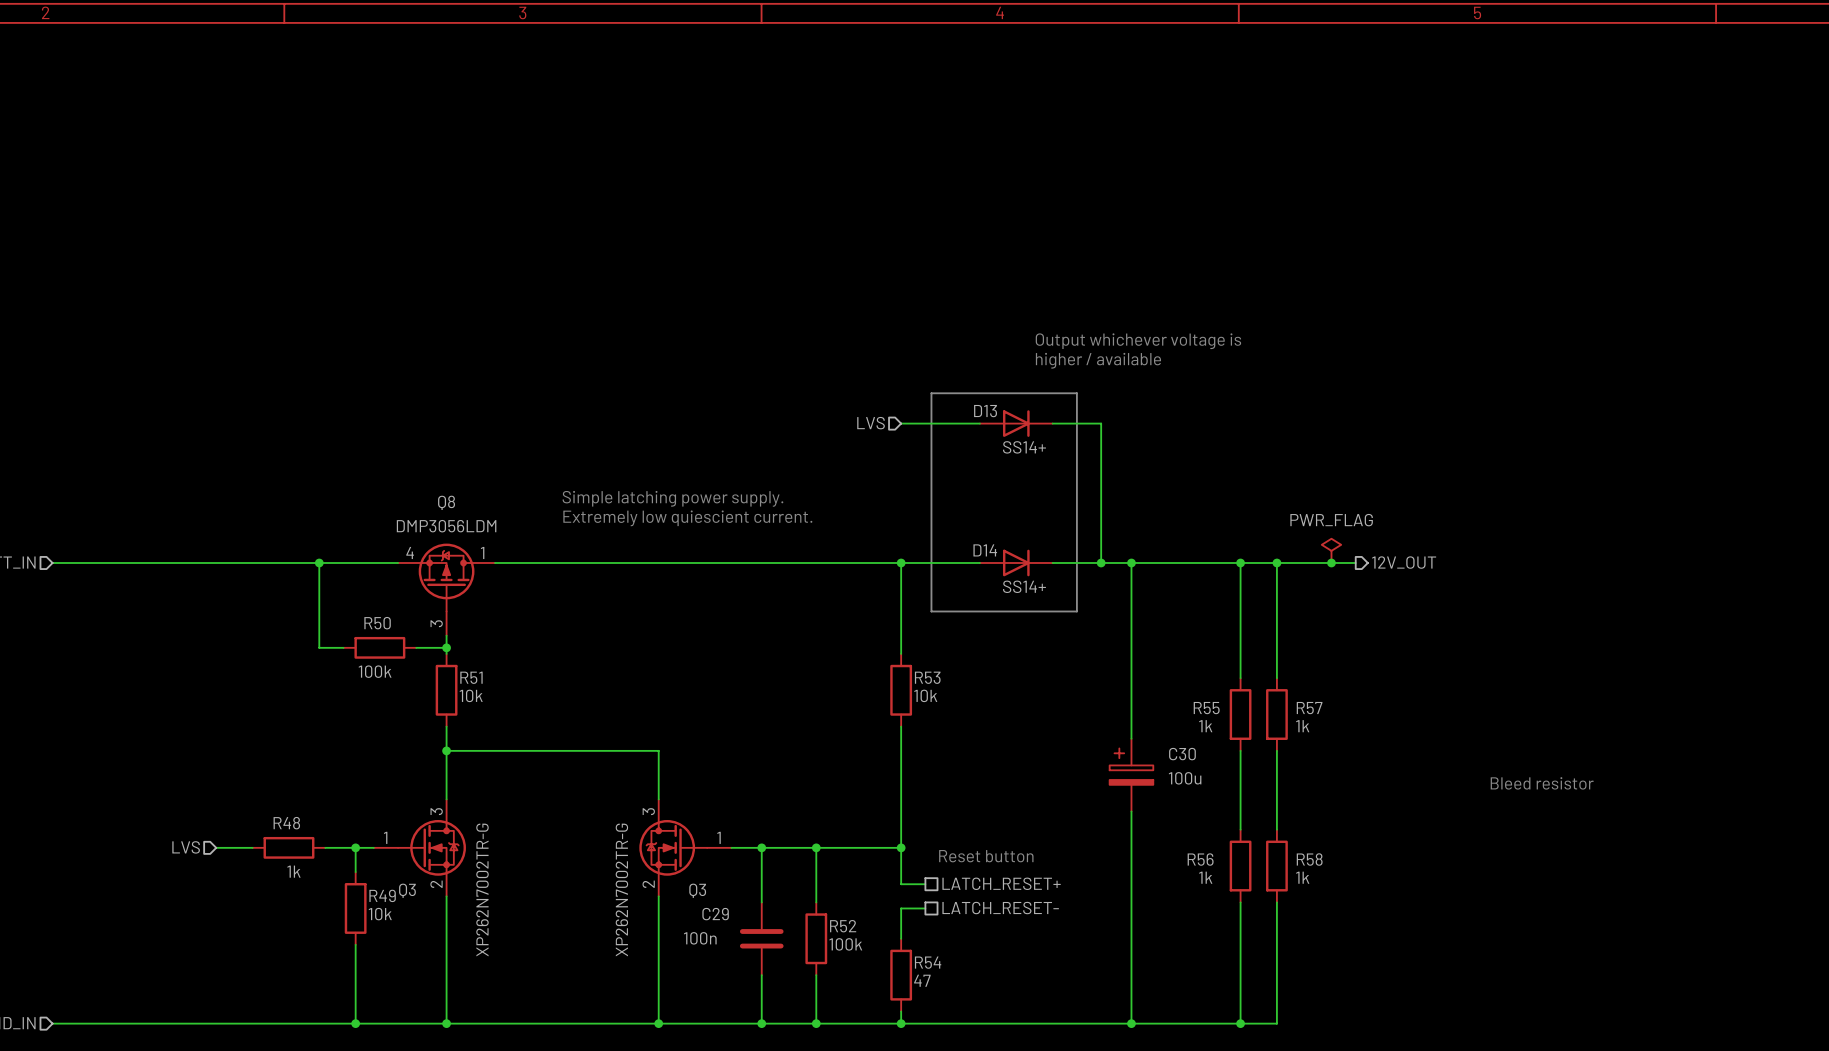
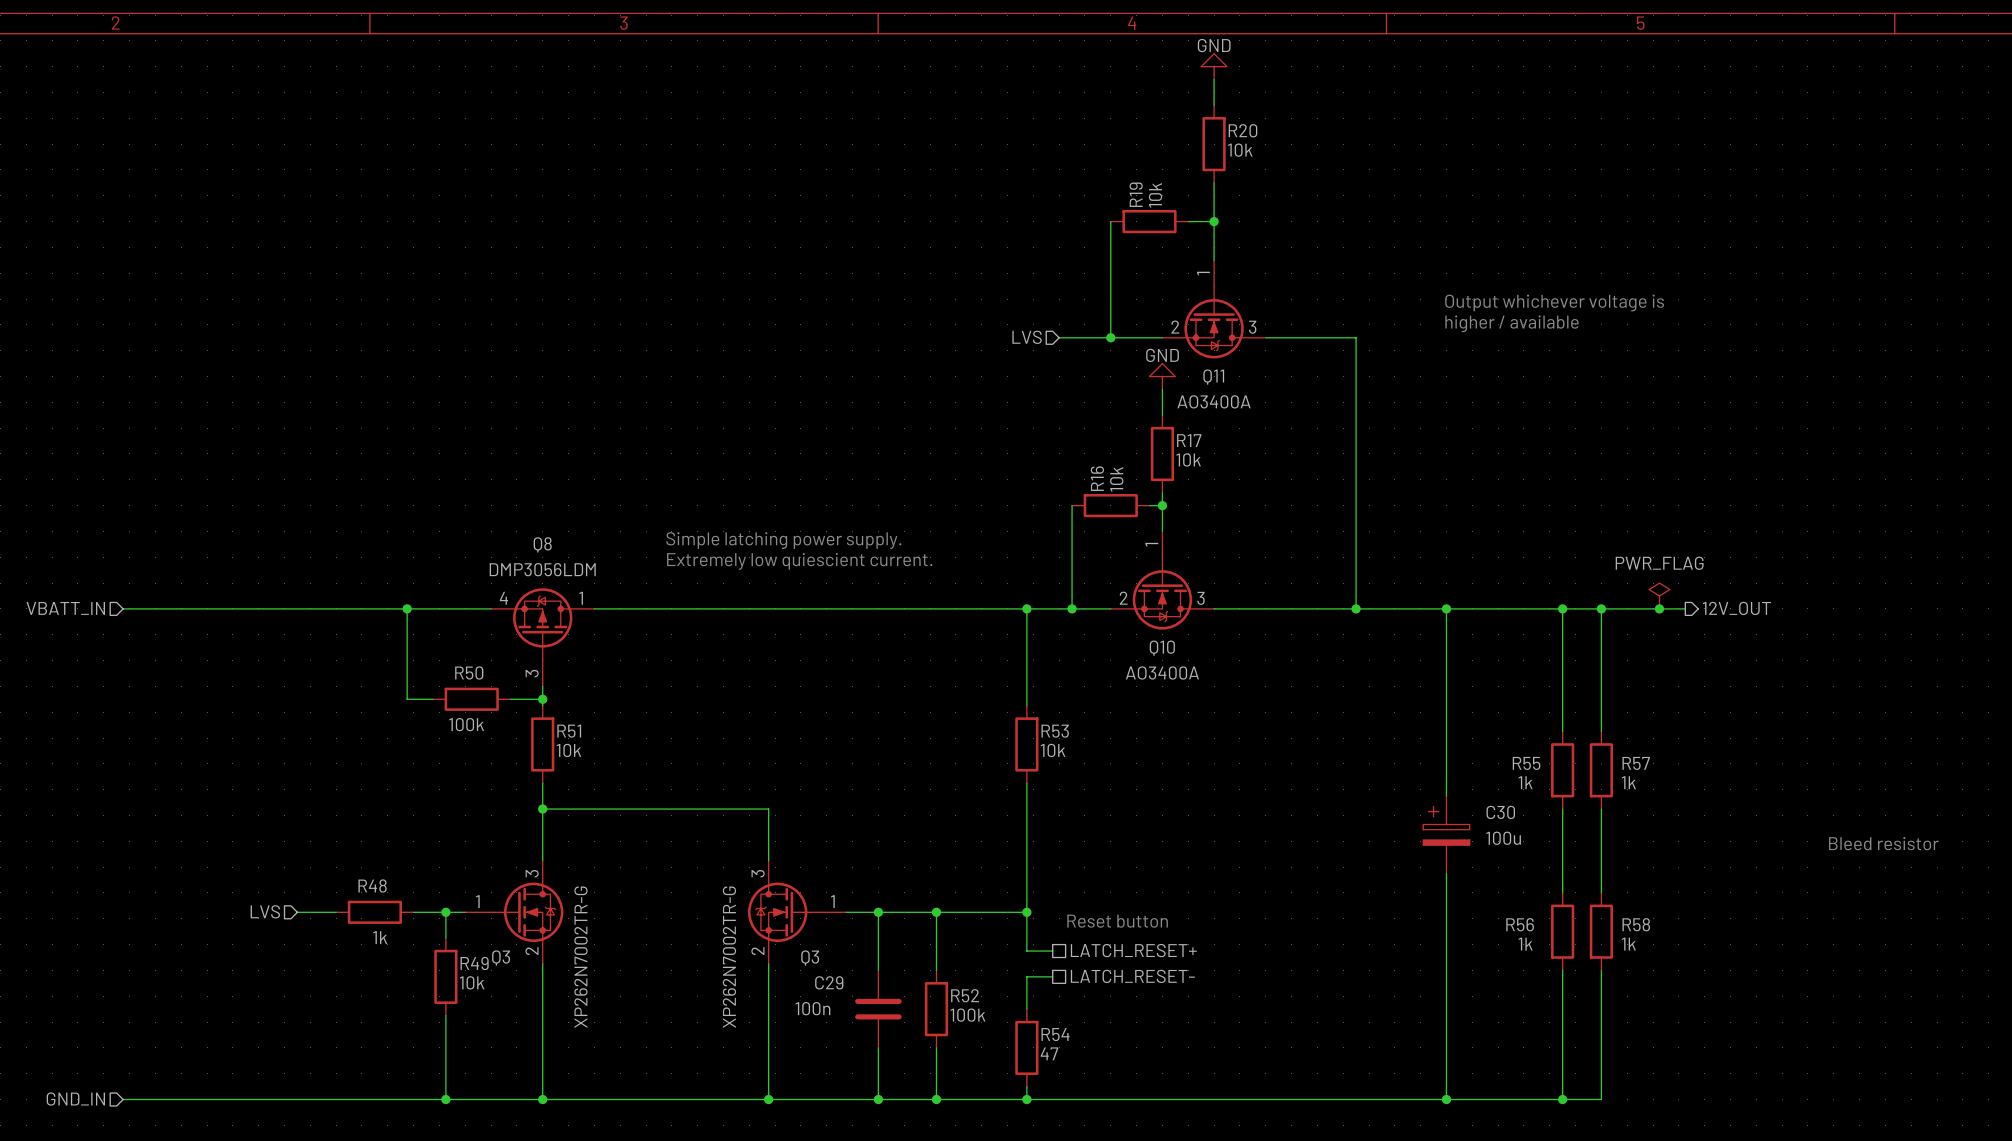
power symbol: none -> GND (1214, 66)
wire: none -> (1214, 79) (1214, 105)
R20: none -> 10k (1214, 144)
wire: none -> (1214, 182) (1214, 260)
wire: none -> (1110, 221) (1110, 337)
R19: none -> 10k (1149, 221)
wire: none -> (1188, 221) (1214, 221)
junction: none -> (1214, 221)
text: none -> Output whichever voltage is (1554, 303)
Q11: none -> AO3400A (1214, 309)
text: none -> higher / available (1511, 323)
wire: none -> (1059, 337) (1162, 337)
junction: none -> (1110, 337)
wire: none -> (1265, 337) (1356, 337) (1356, 608)
text: Output whichever voltage is (1138, 341) -> none
power symbol: none -> GND (1162, 376)
wire: none -> (1162, 389) (1162, 415)
text: higher / available (1098, 360) -> none
line: (931, 393) (1076, 393) (1076, 611) (931, 611) (931, 393) -> none
R17: none -> 10k (1162, 453)
hierarchical label position: LVS (871, 423) -> LVS (1027, 337)
wire: (901, 423) (979, 423) -> none
D13: SS14+ (1016, 423) -> none
wire: (1052, 423) (1101, 423) (1101, 562) -> none
wire: none -> (1162, 492) (1162, 531)
wire: none -> (1072, 505) (1072, 608)
R16: none -> 10k (1110, 505)
wire: none -> (1149, 505) (1162, 505)
junction: none -> (1162, 505)
Q10: none -> AO3400A (1162, 580)
power symbol position: PWR_FLAG (1331, 550) -> PWR_FLAG (1659, 596)
junction: none -> (1072, 608)
D14: SS14+ (1016, 562) -> none
junction: (1101, 562) -> none
wire: (1131, 562) (1131, 738) -> (1446, 608) (1446, 796)
junction: (1131, 562) -> none
junction: none -> (1356, 608)
wire: (1240, 562) (1240, 678) -> (1562, 608) (1562, 731)
junction: (1240, 562) -> none
wire: (1276, 562) (1276, 678) -> (1601, 608) (1601, 731)
junction: (1276, 562) -> none
junction: none -> (1446, 608)
junction: (1331, 562) -> none
wire: none -> (1511, 608) (1685, 608)
junction: none -> (1562, 608)
hierarchical label position: 12V_OUT (1404, 562) -> 12V_OUT (1736, 608)
junction: none -> (1601, 608)
junction: none -> (1659, 608)
R55 position: (1240, 714) -> (1562, 770)
R57 position: (1276, 714) -> (1601, 770)
wire: (1240, 750) (1240, 829) -> (1562, 809) (1562, 892)
wire: (1276, 750) (1276, 829) -> (1601, 809) (1601, 892)
C30 position: (1131, 775) -> (1446, 834)
text position: Bleed resistor (1542, 783) -> Bleed resistor (1883, 843)
wire: (1131, 811) (1131, 1023) -> (1446, 873) (1446, 1099)
R56 position: (1240, 866) -> (1562, 931)
R58 position: (1276, 866) -> (1601, 931)
wire: (1240, 902) (1240, 1023) -> (1562, 970) (1562, 1099)
wire: (1276, 902) (1276, 1023) -> (1601, 970) (1601, 1099) (1427, 1099)
junction: (1131, 1023) -> none
junction position: (1240, 1023) -> (1446, 1099)
junction: none -> (1562, 1099)

